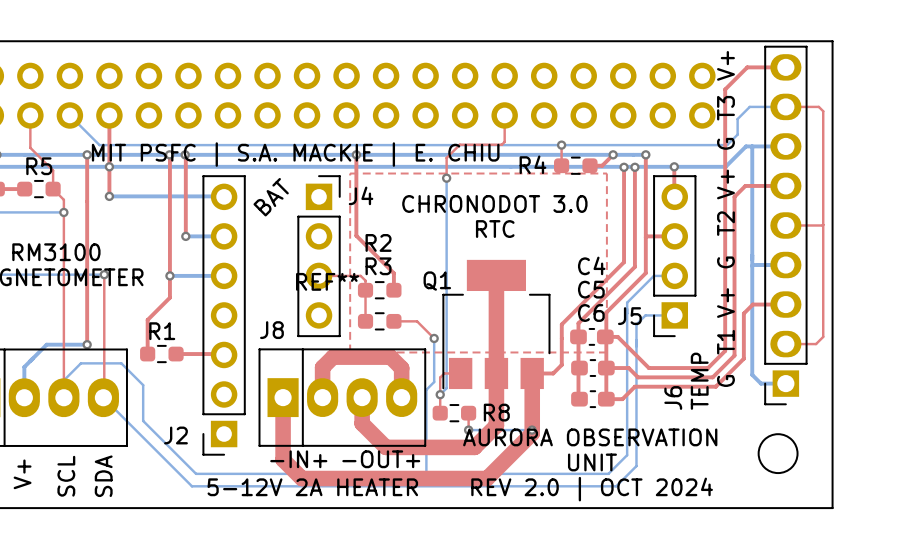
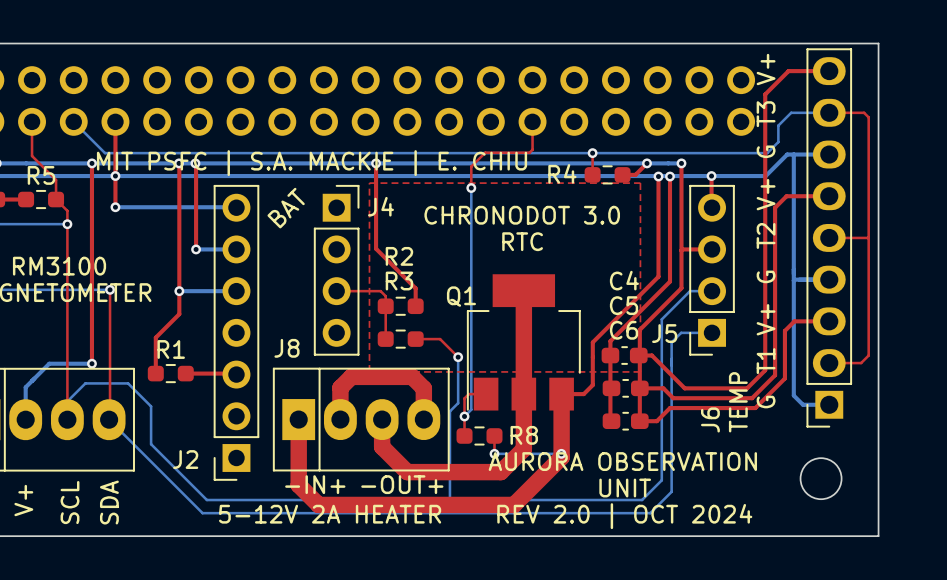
REF**: (327, 281) -> none

